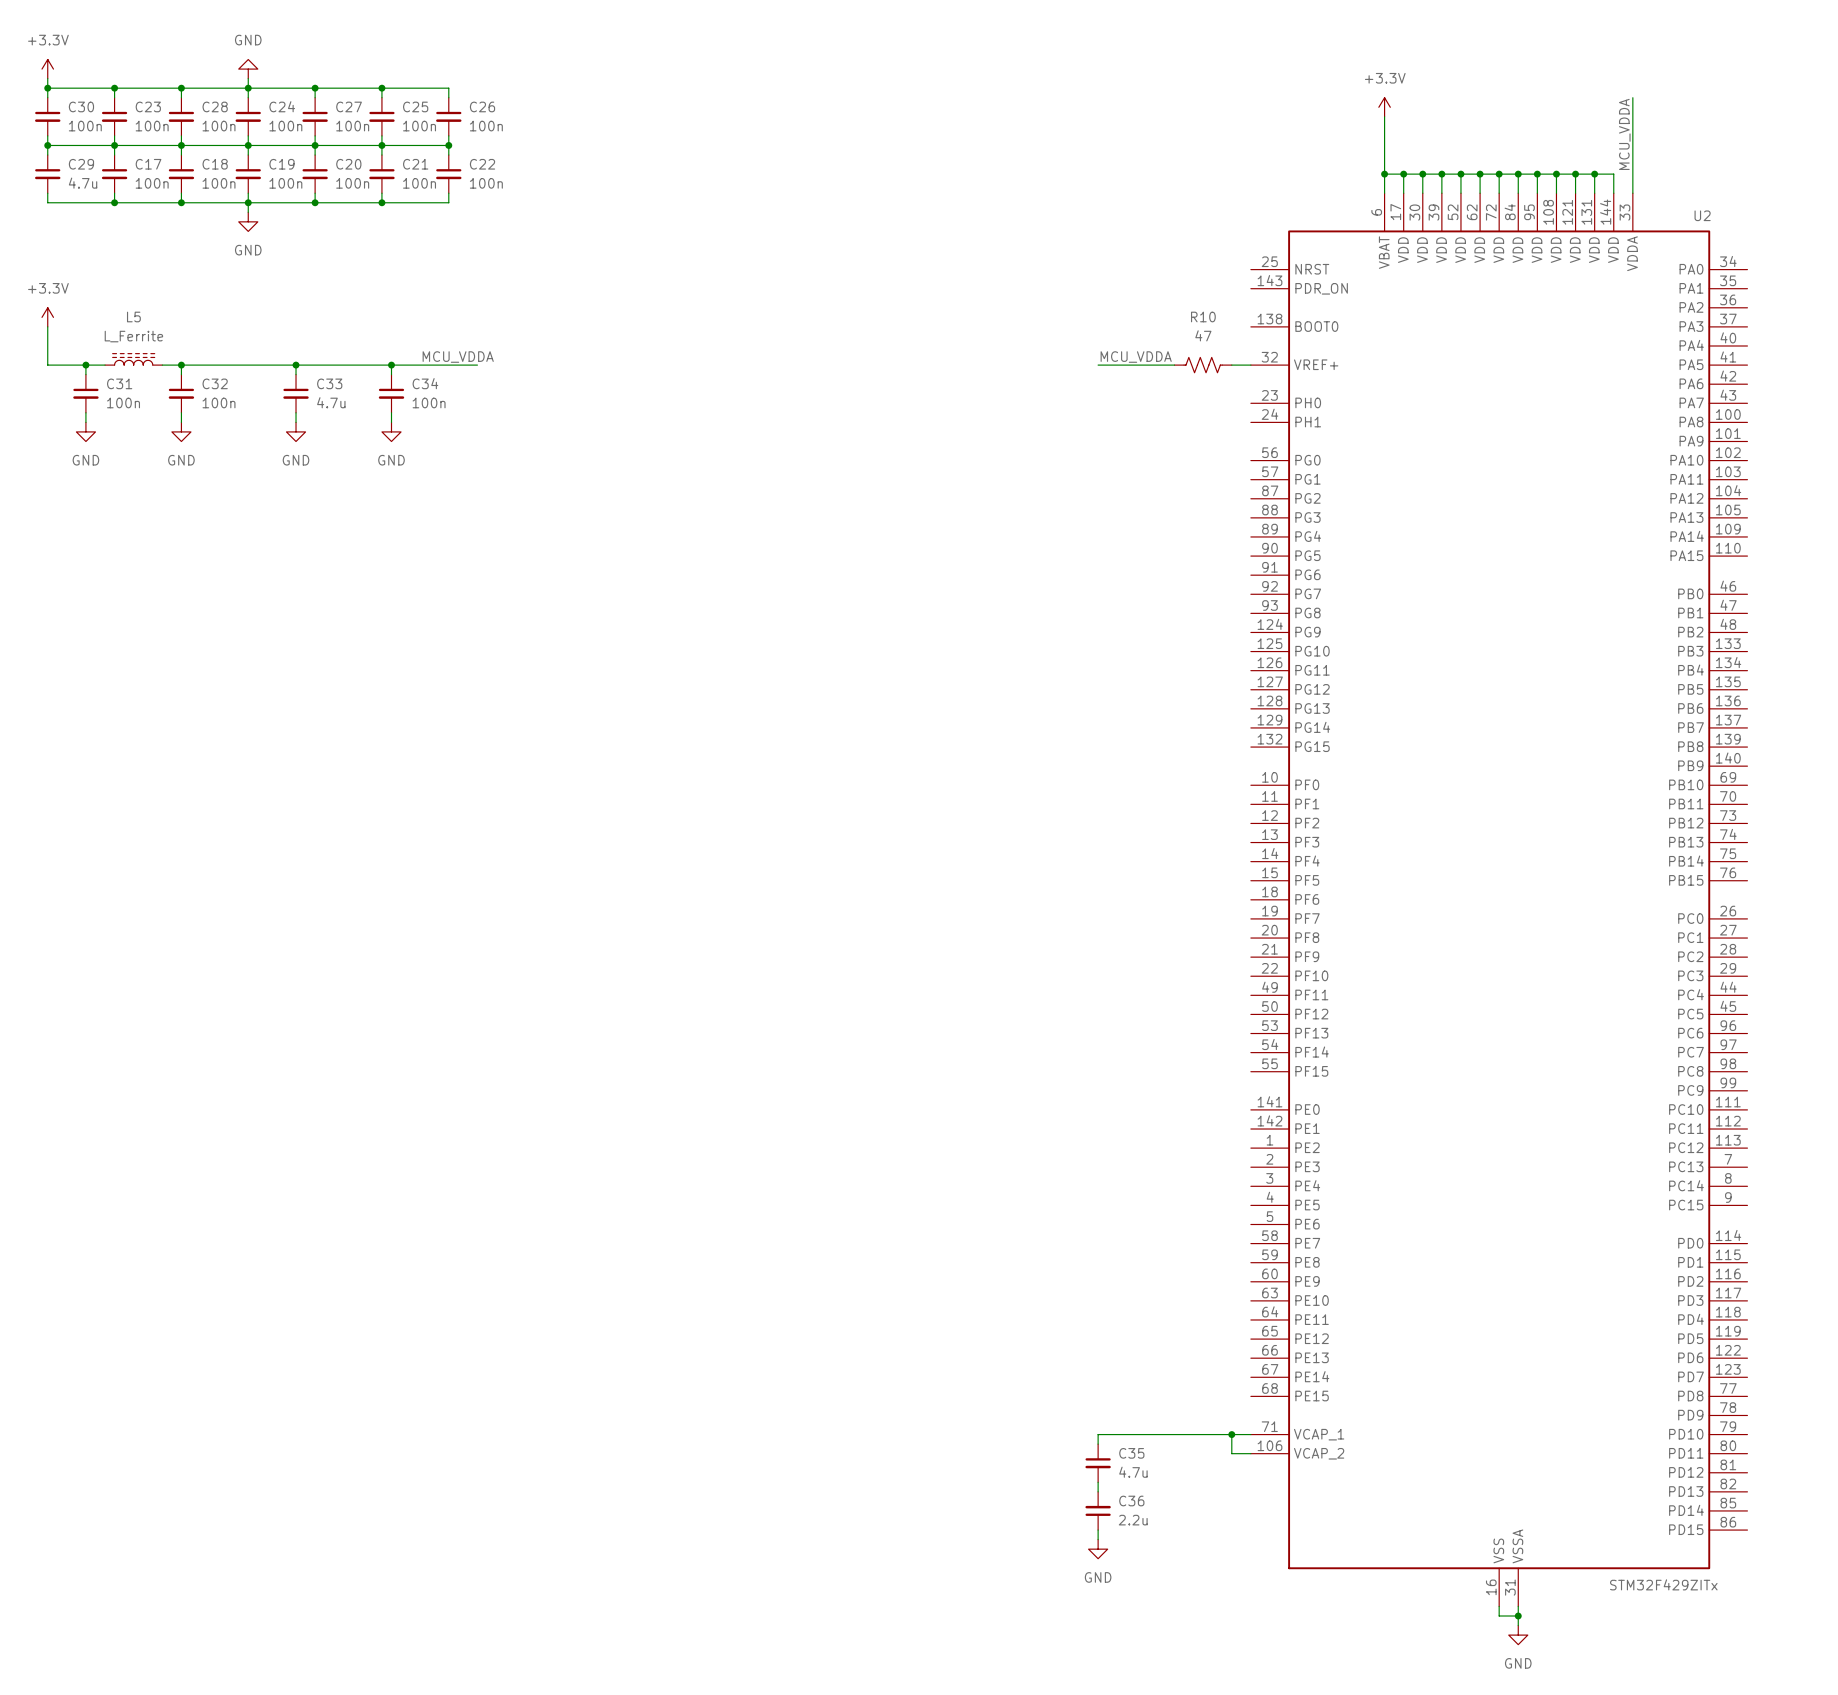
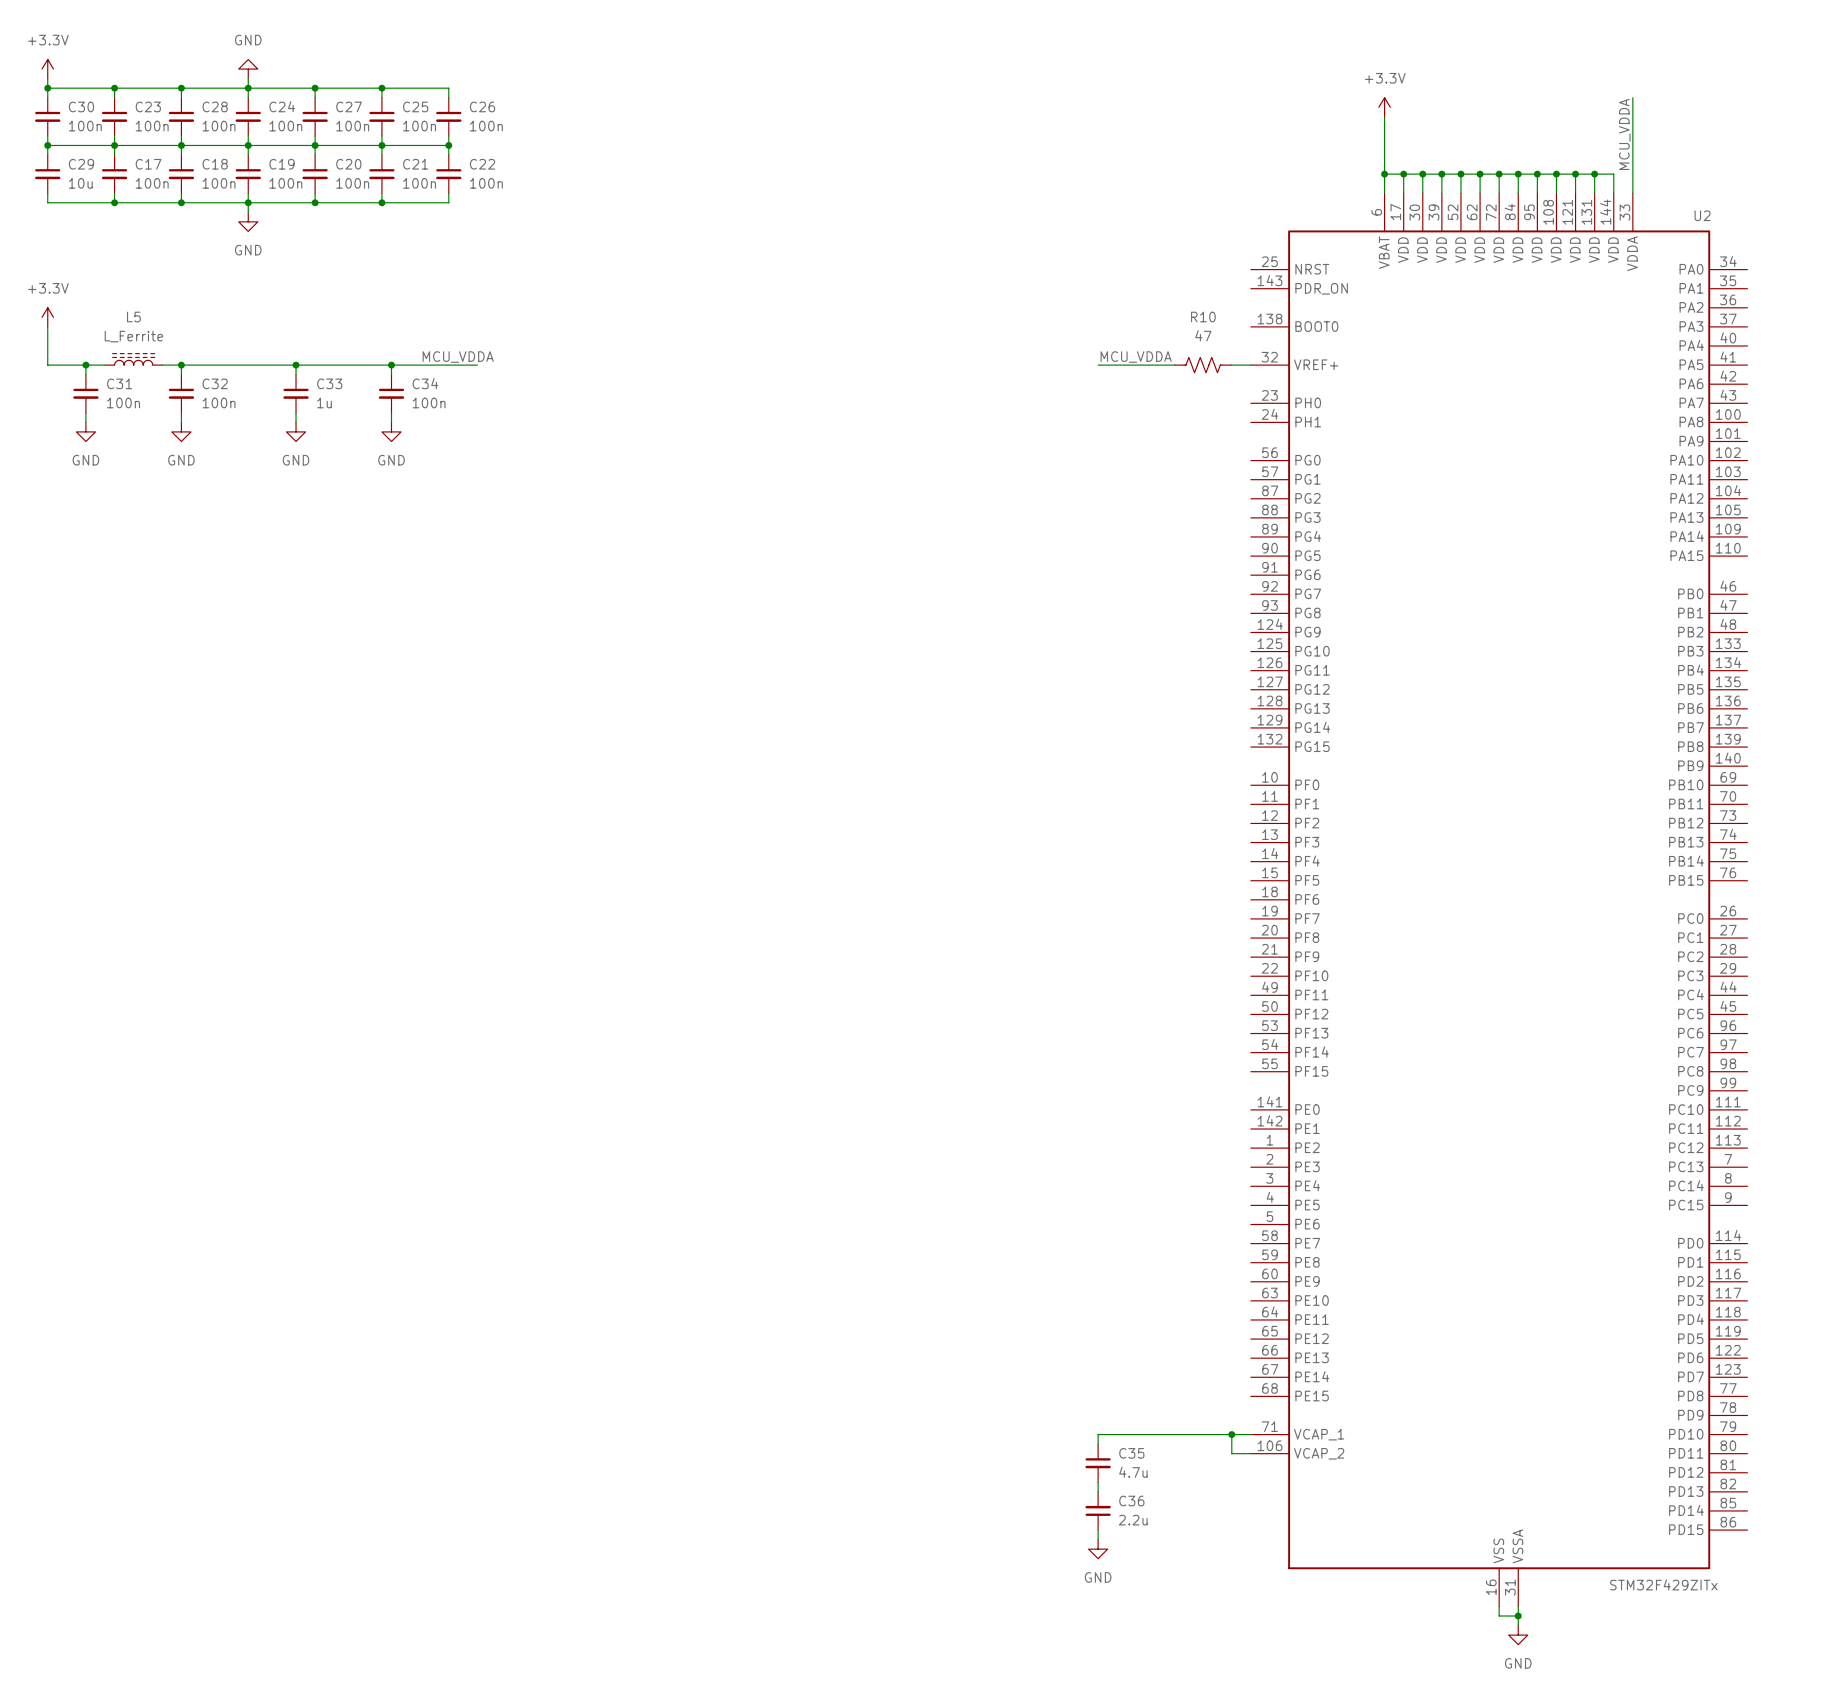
C29 value: 4.7u (83, 183) -> 10u (80, 183)
C33 value: 4.7u (331, 402) -> 1u (324, 402)

